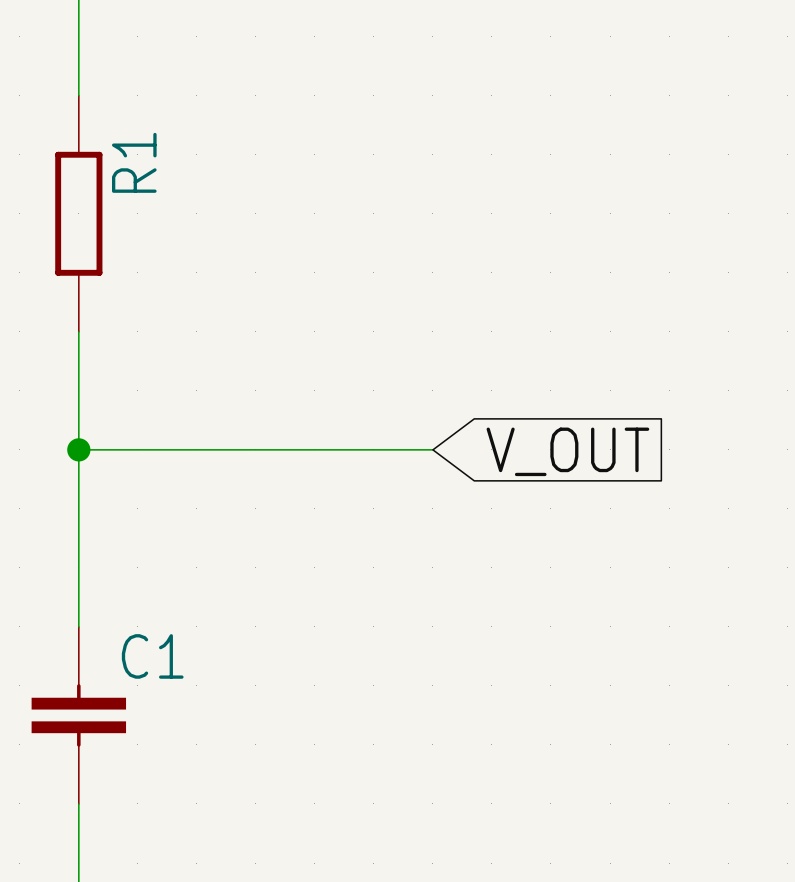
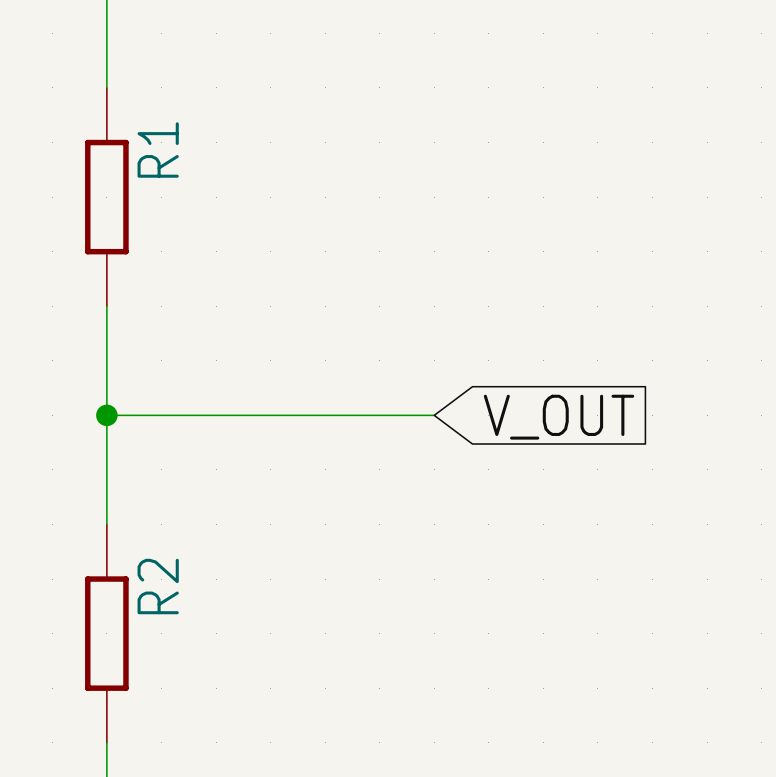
R2: none -> (106, 633)
C1: (78, 715) -> none

